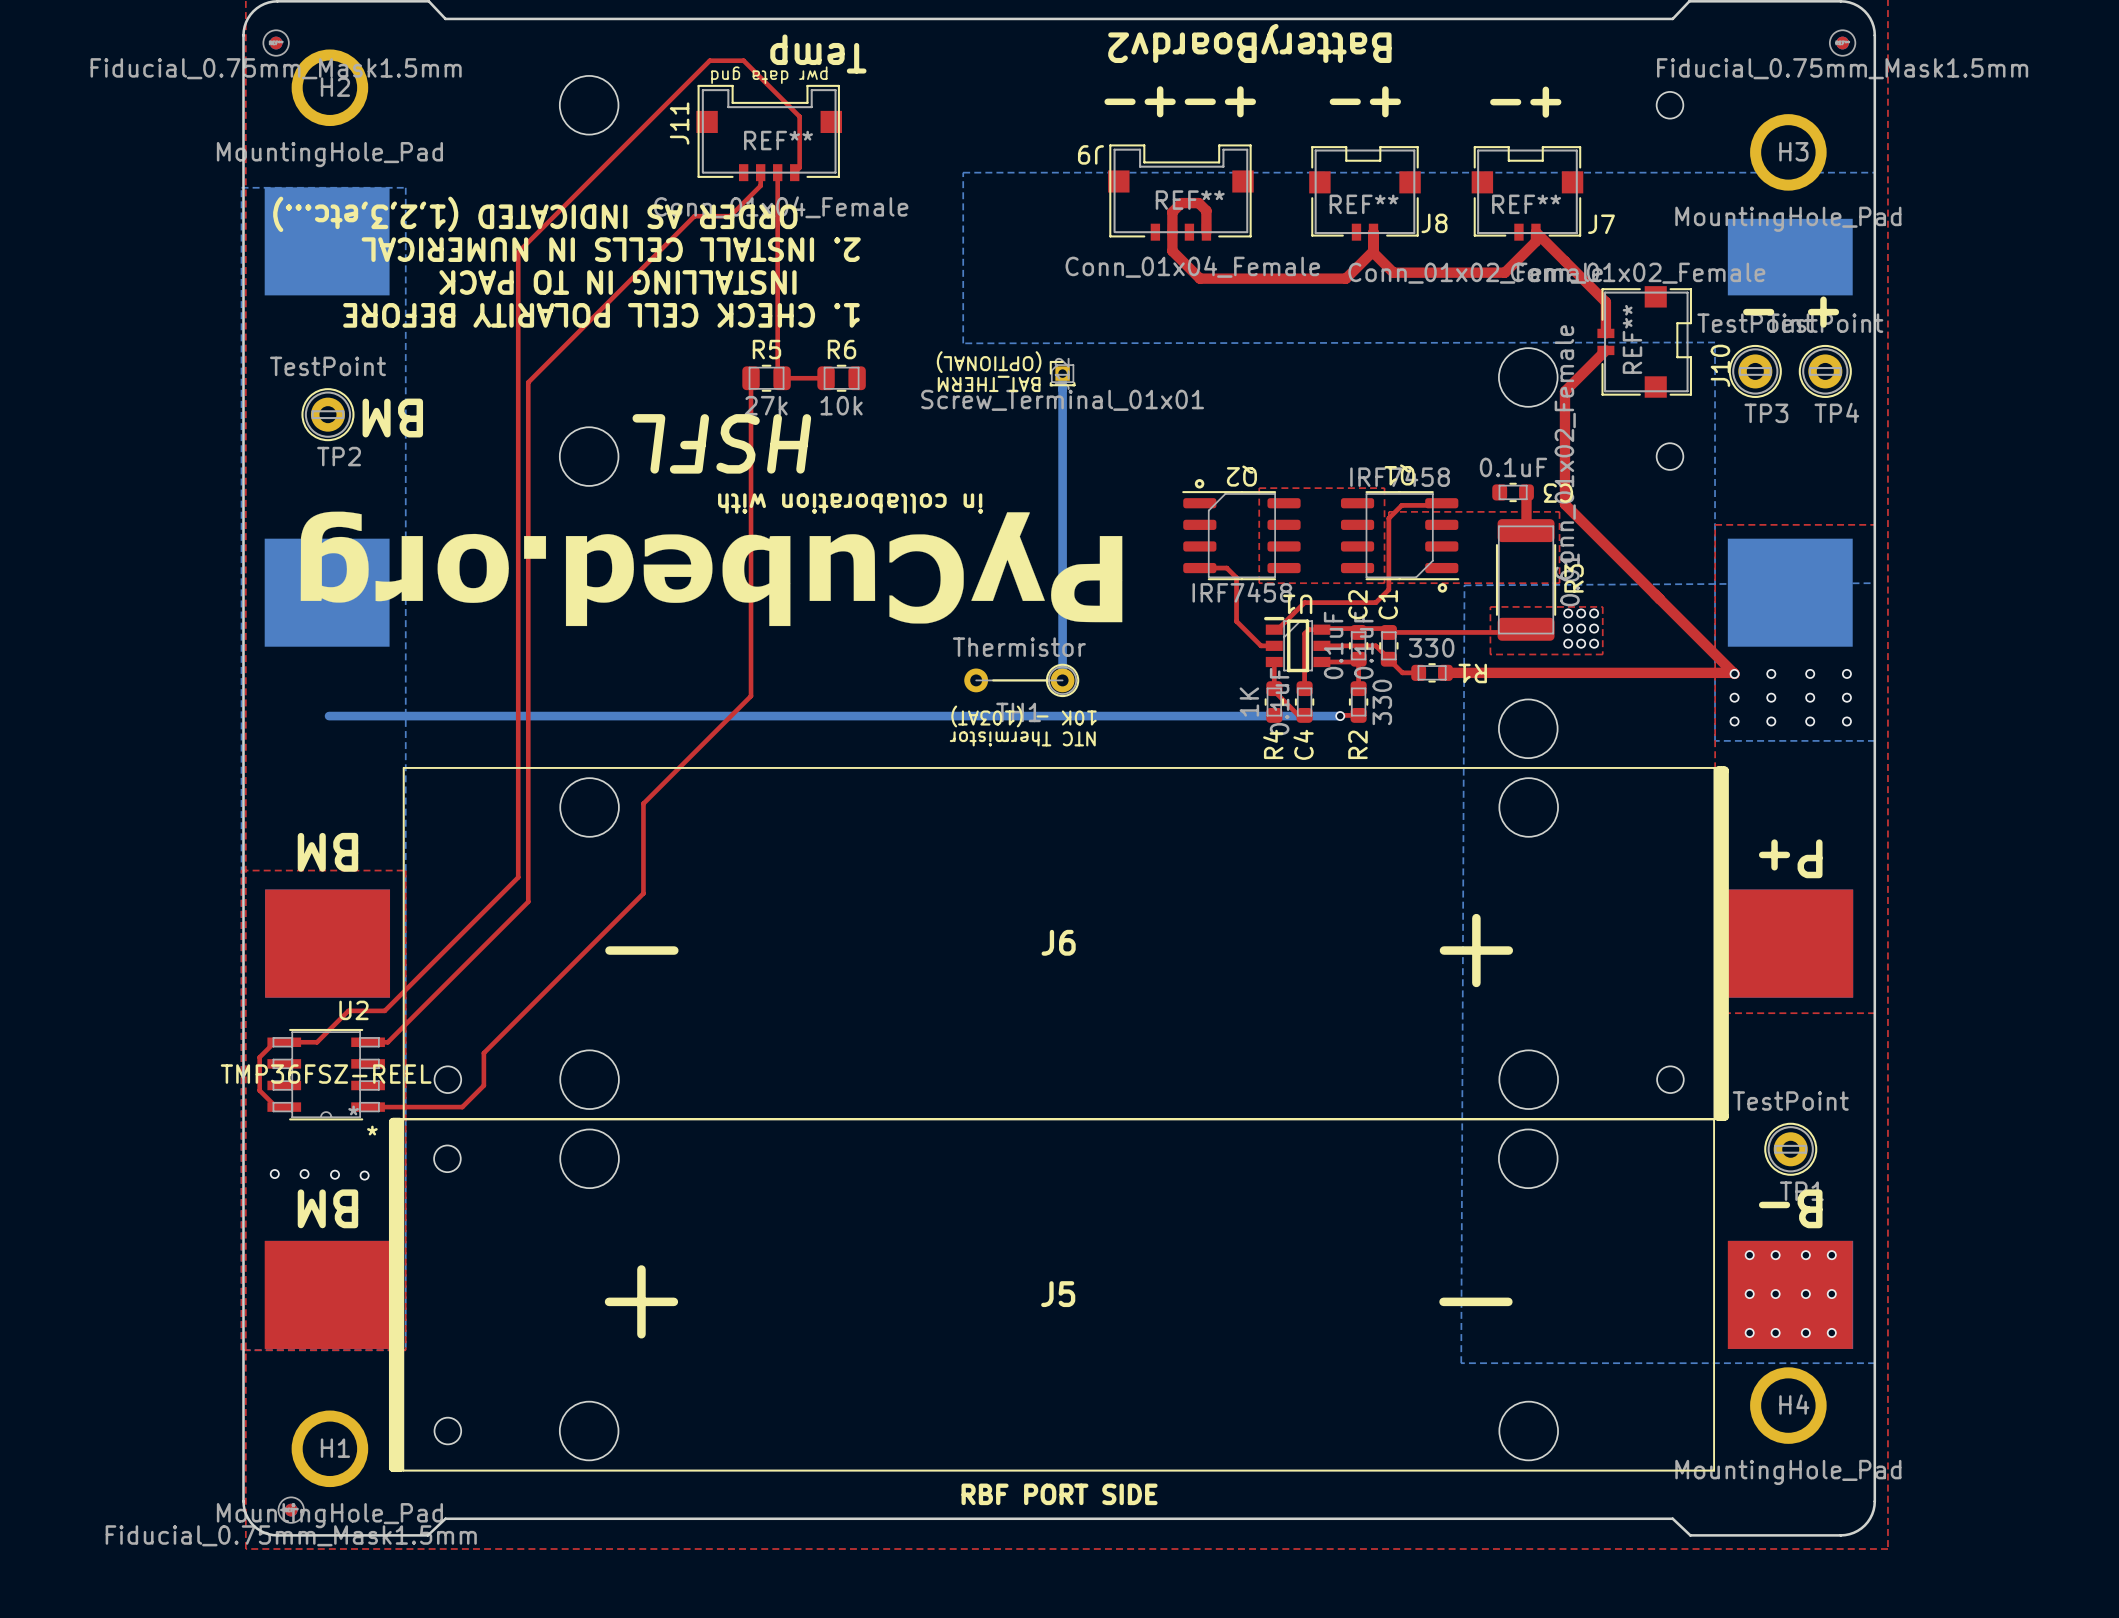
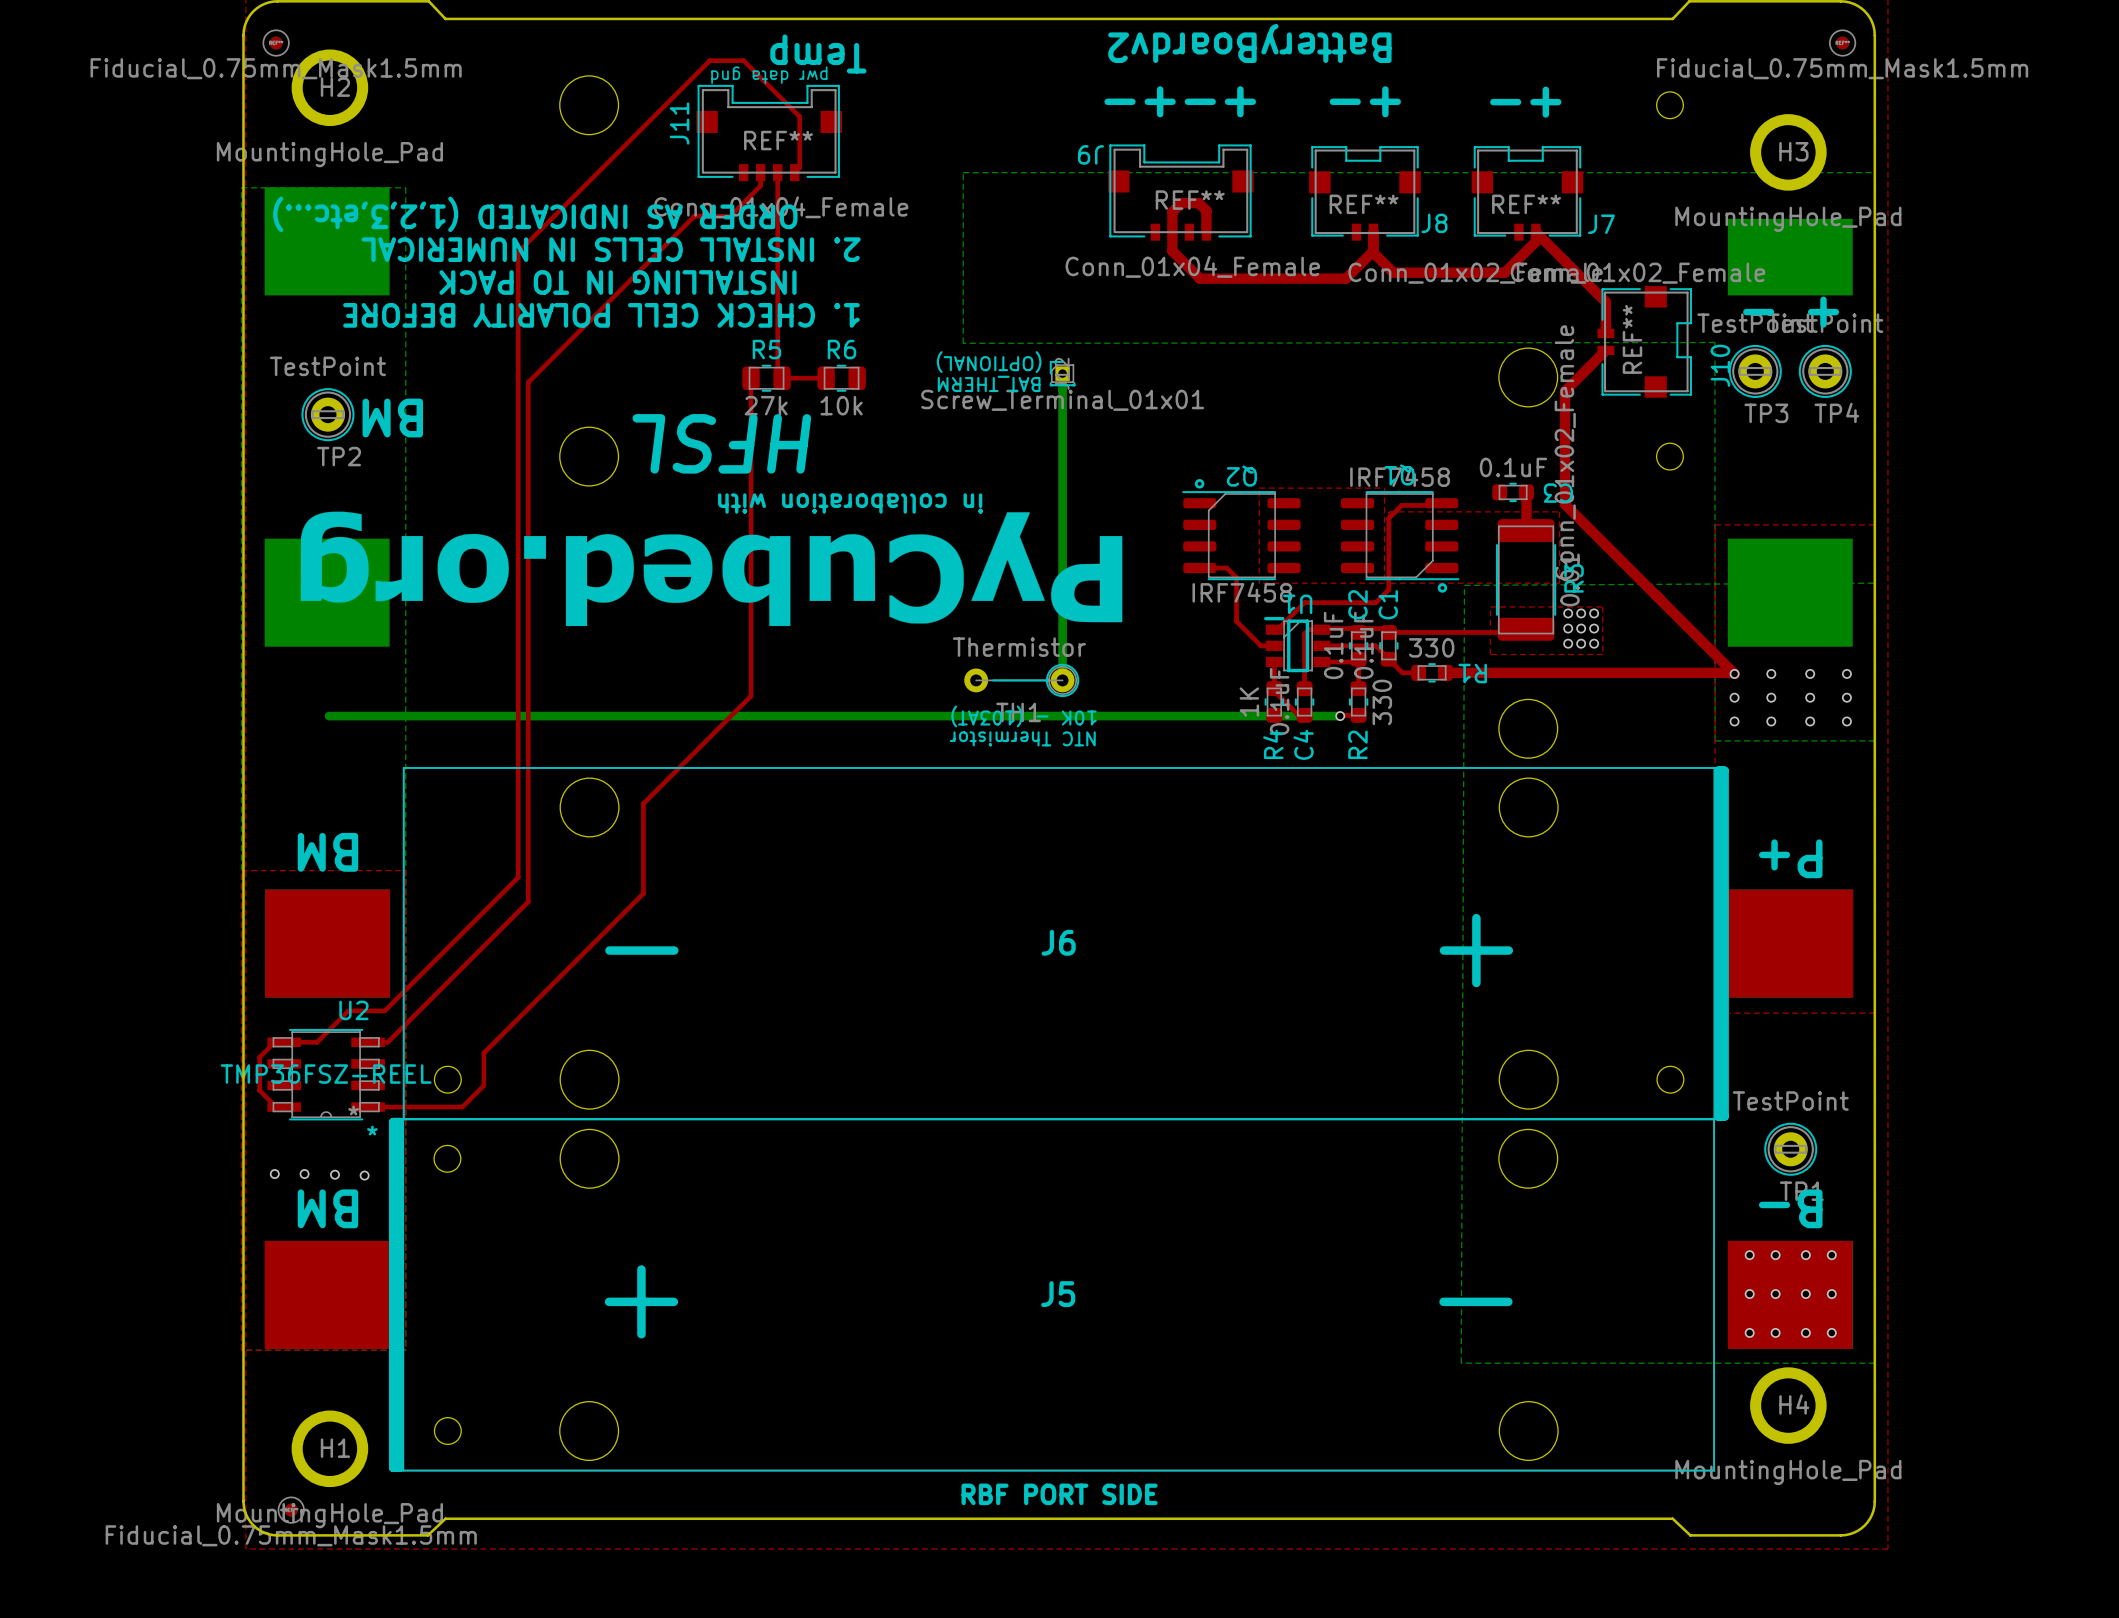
text: HSFL (721, 443) -> HFSL (721, 443)

